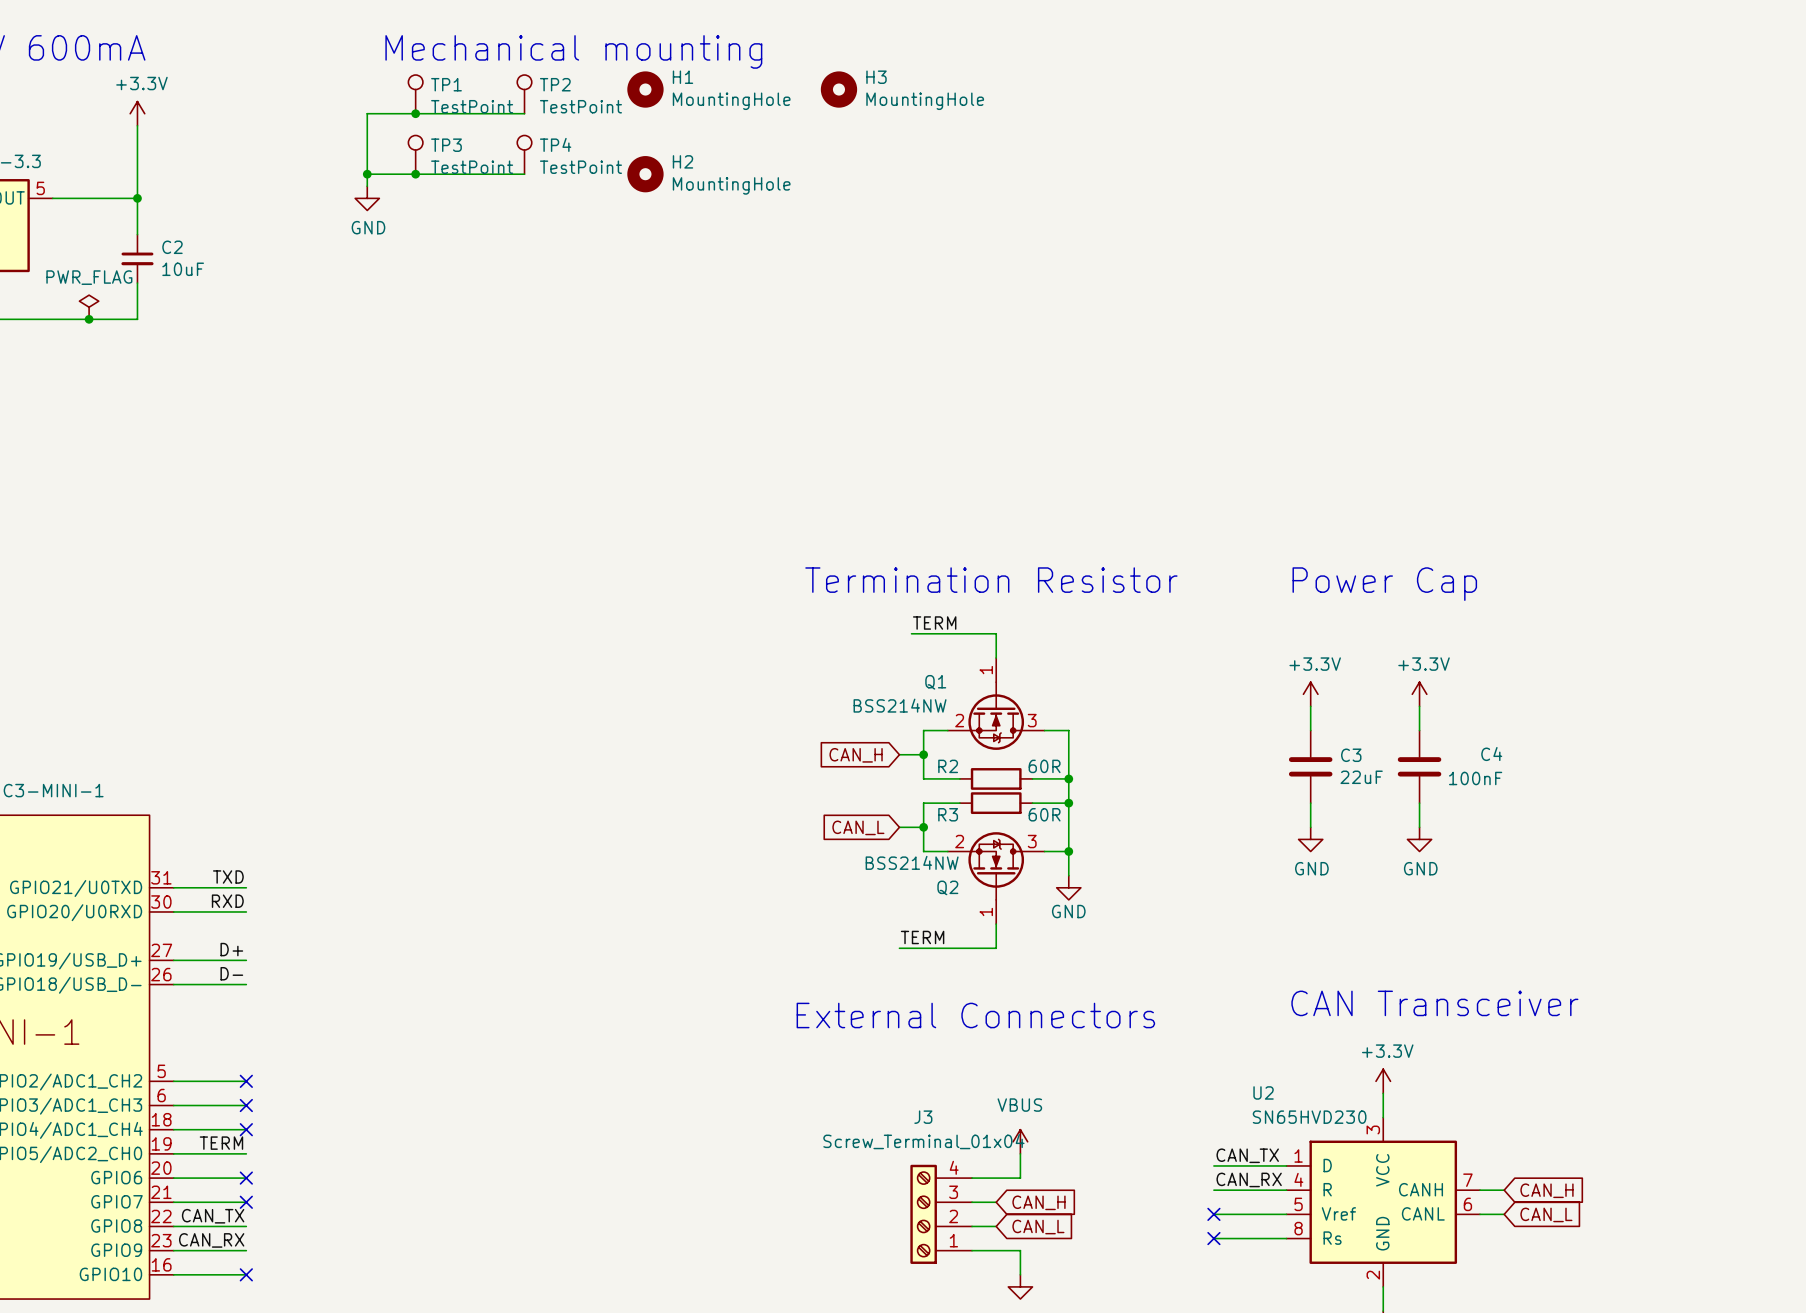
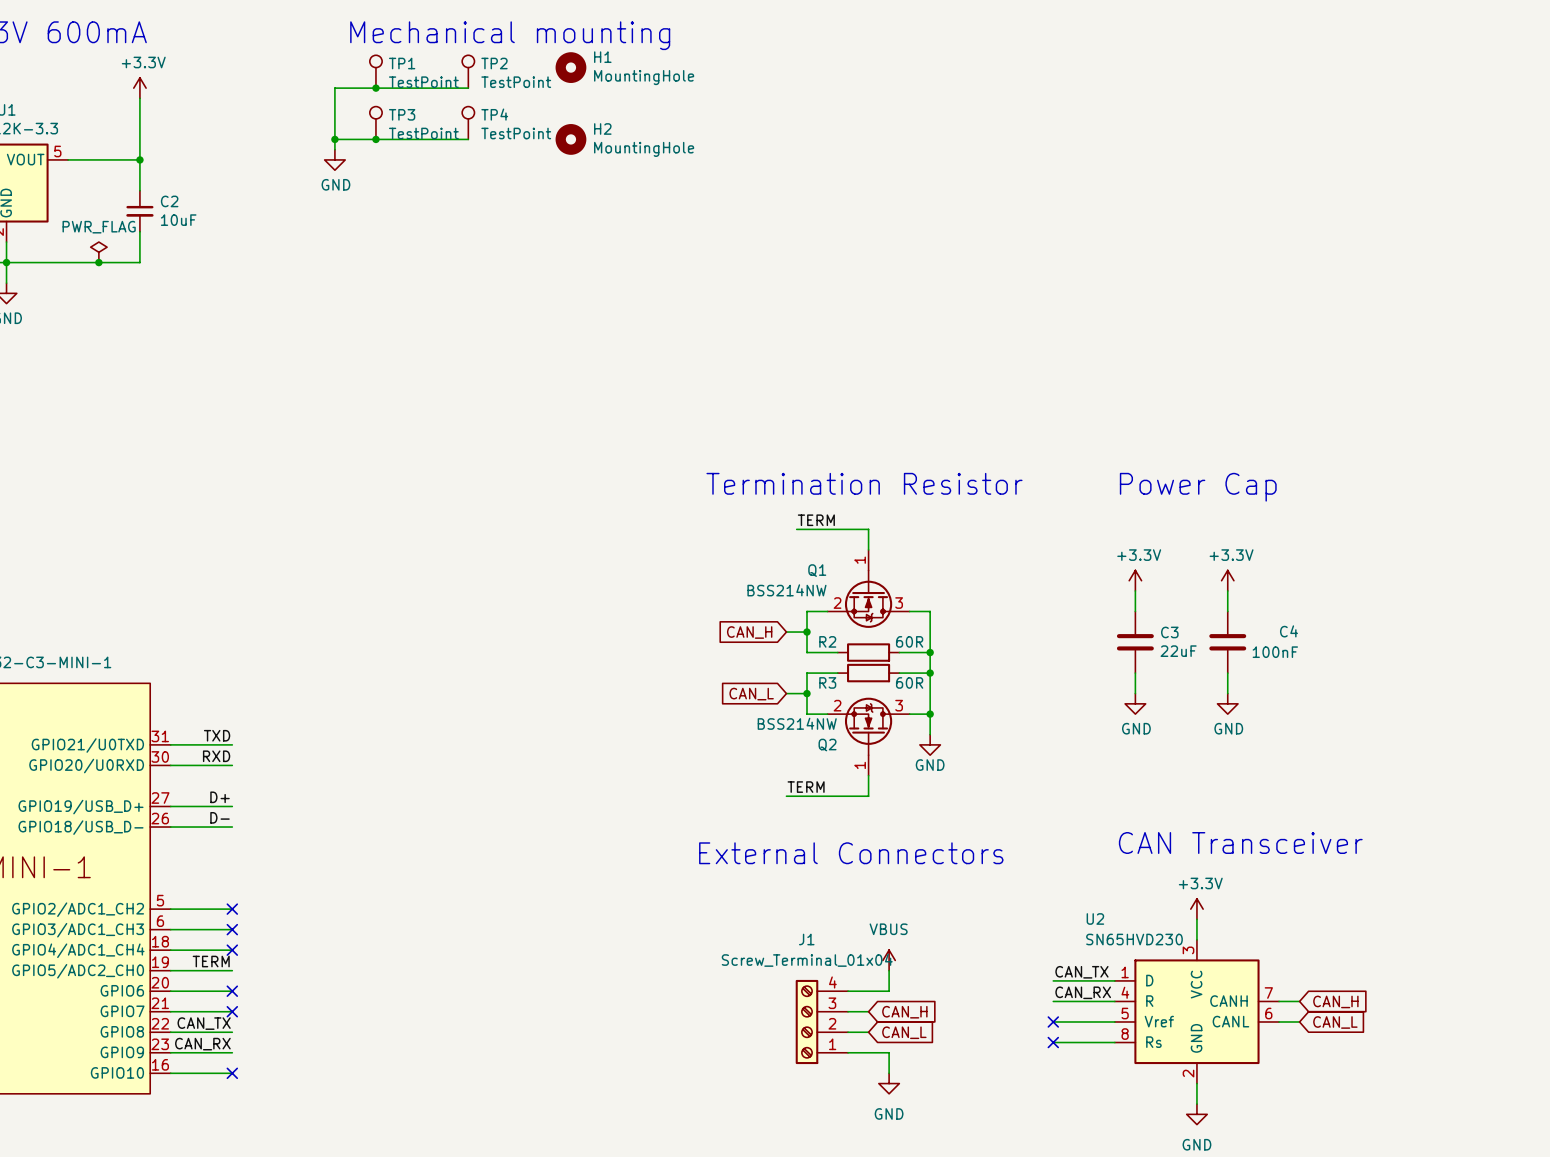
H3: MountingHole (838, 89) -> none
J3 name: J3 (923, 1117) -> J1 (806, 939)

